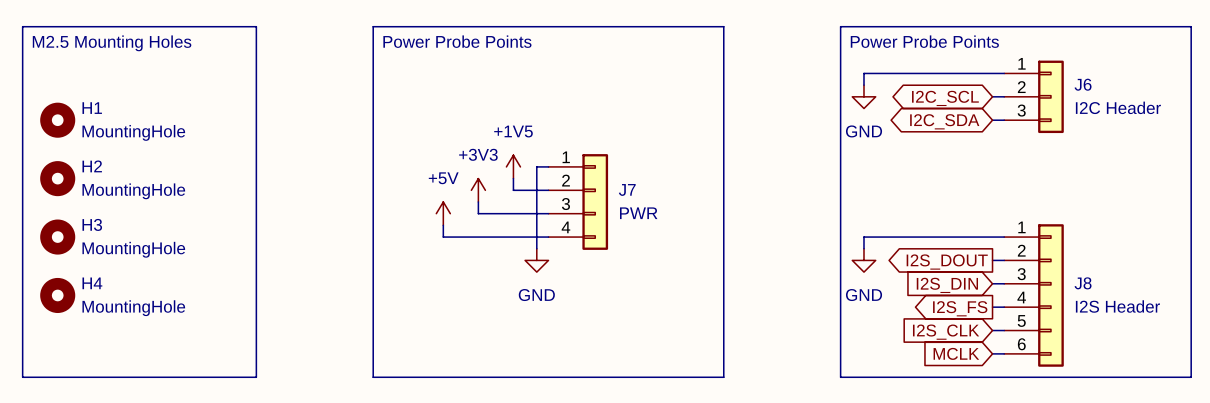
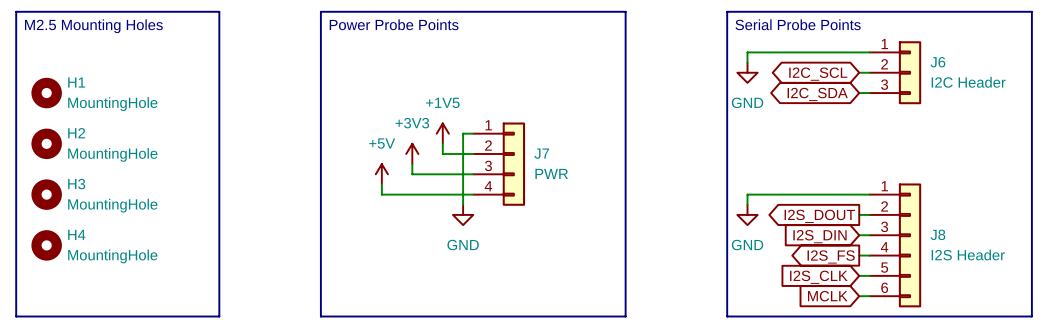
text: Power Probe Points (924, 41) -> Serial Probe Points (798, 24)

